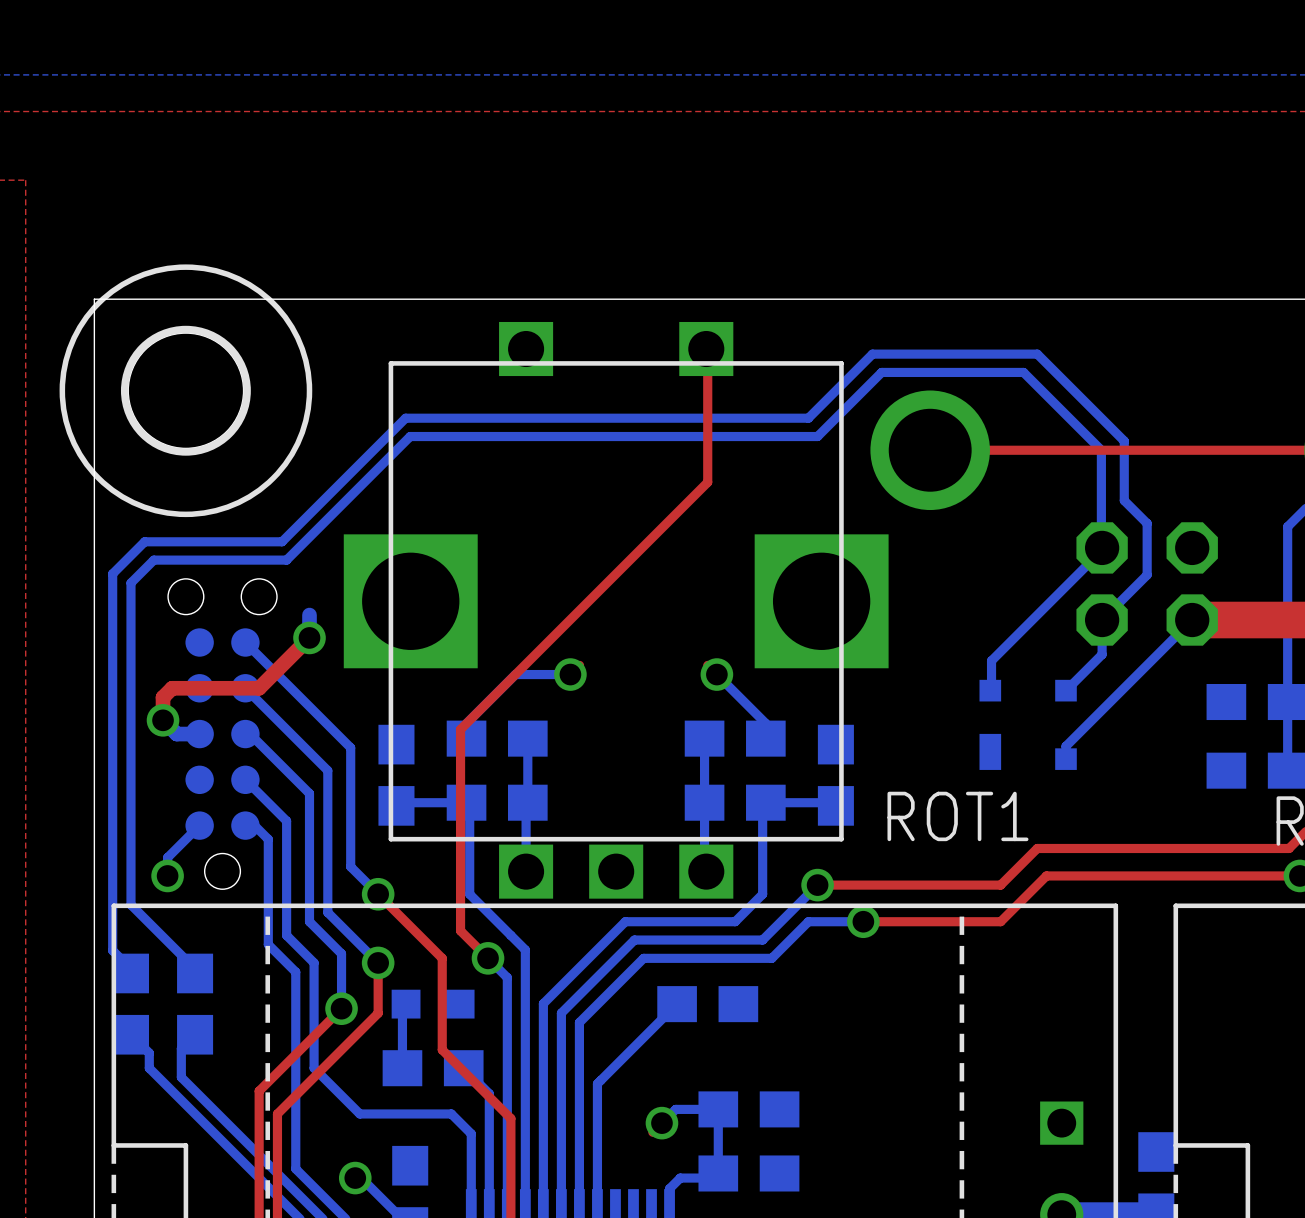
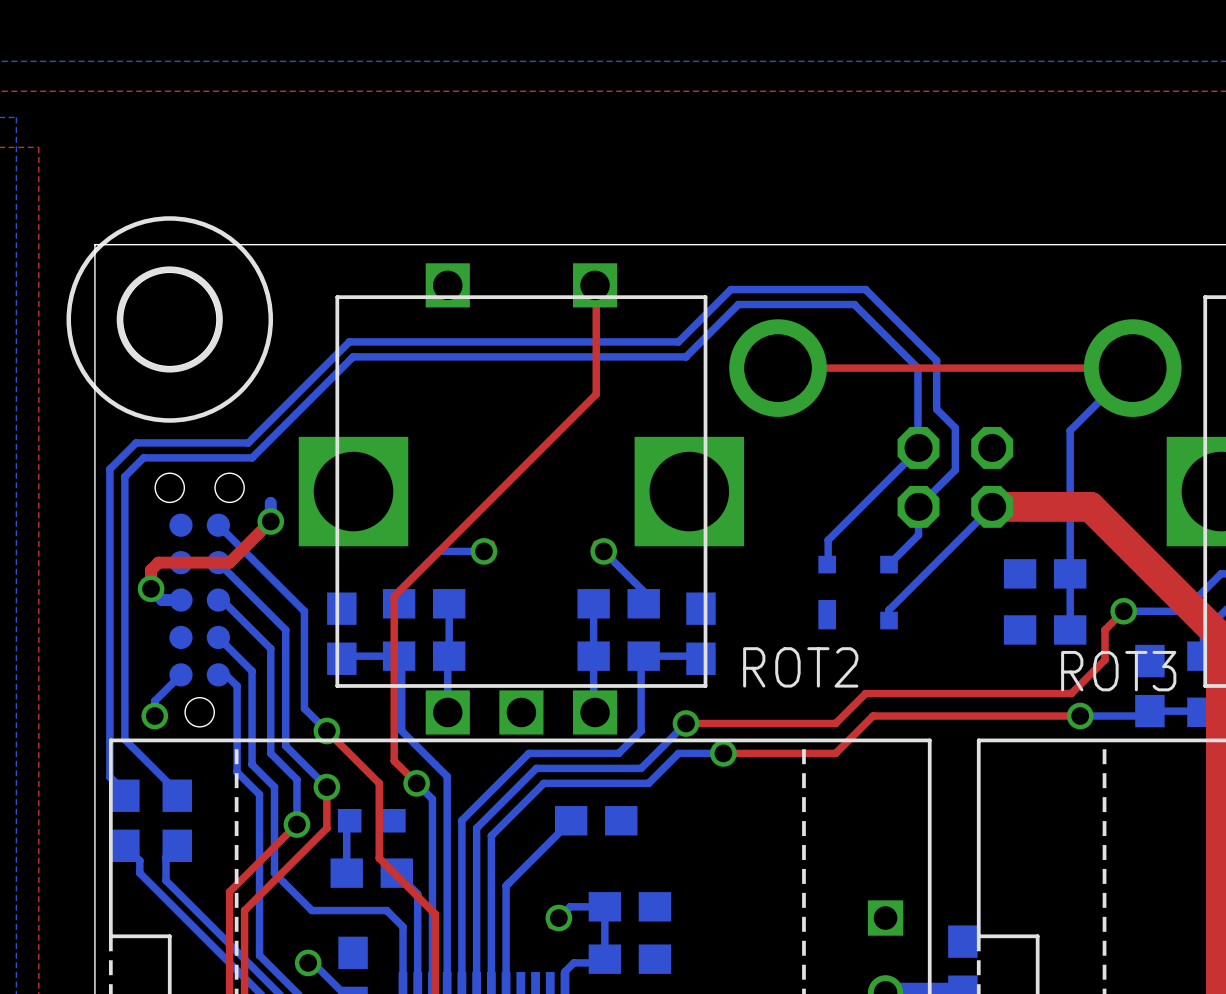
ROT1 name: ROT1 (957, 816) -> ROT2 (800, 667)

